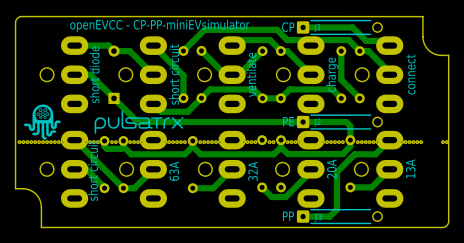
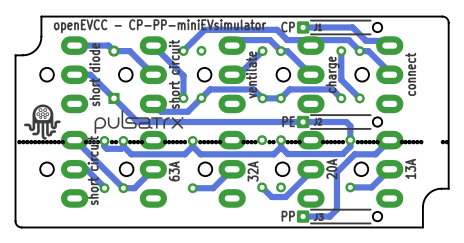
track: (201, 50) (225, 74) (232, 74) -> none
board edge: (448, 55) (434, 53) (425, 46) (423, 39) (422, 16) (19, 17) (15, 22) (15, 188) (29, 190) (38, 198) (41, 204) (41, 227) -> (448, 55) (448, 21) (443, 16) (41, 16) (41, 39) (38, 46) (29, 53) (15, 55) (15, 222) (20, 227) (41, 227)
board edge: (448, 188) (447, 224) (443, 227) (422, 227) -> (448, 188) (434, 190) (425, 198) (423, 204) (422, 227)

